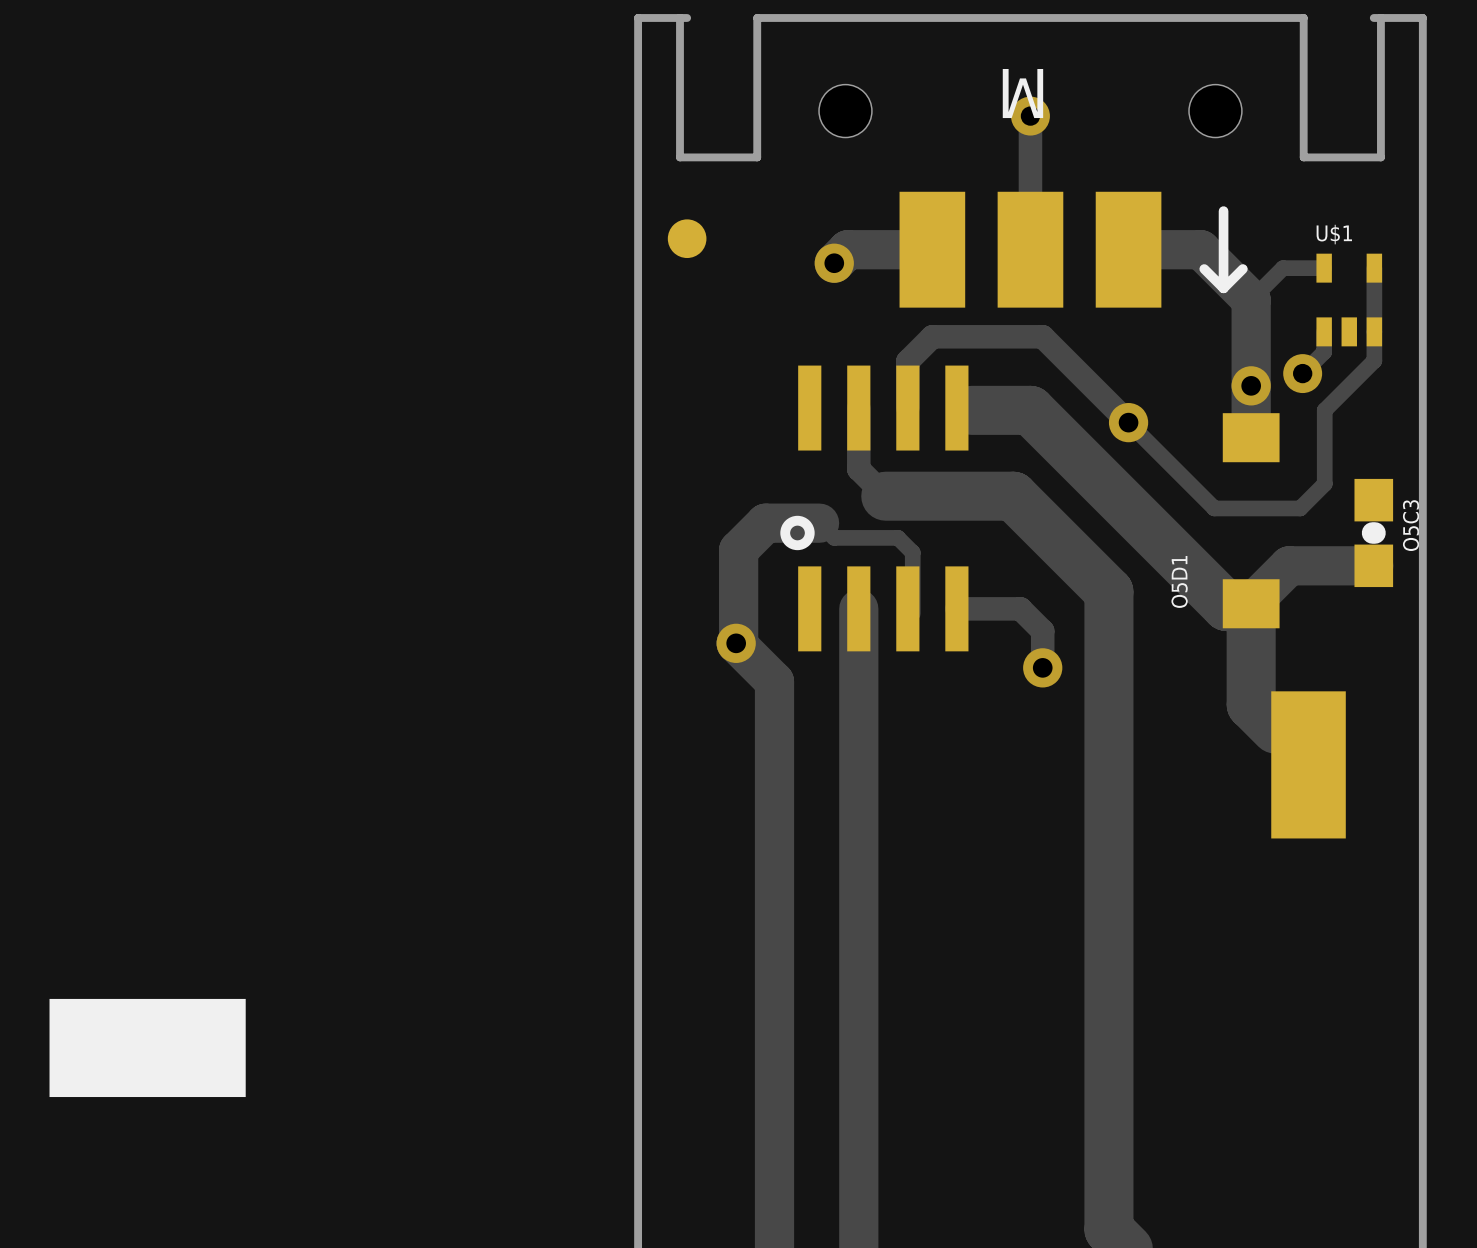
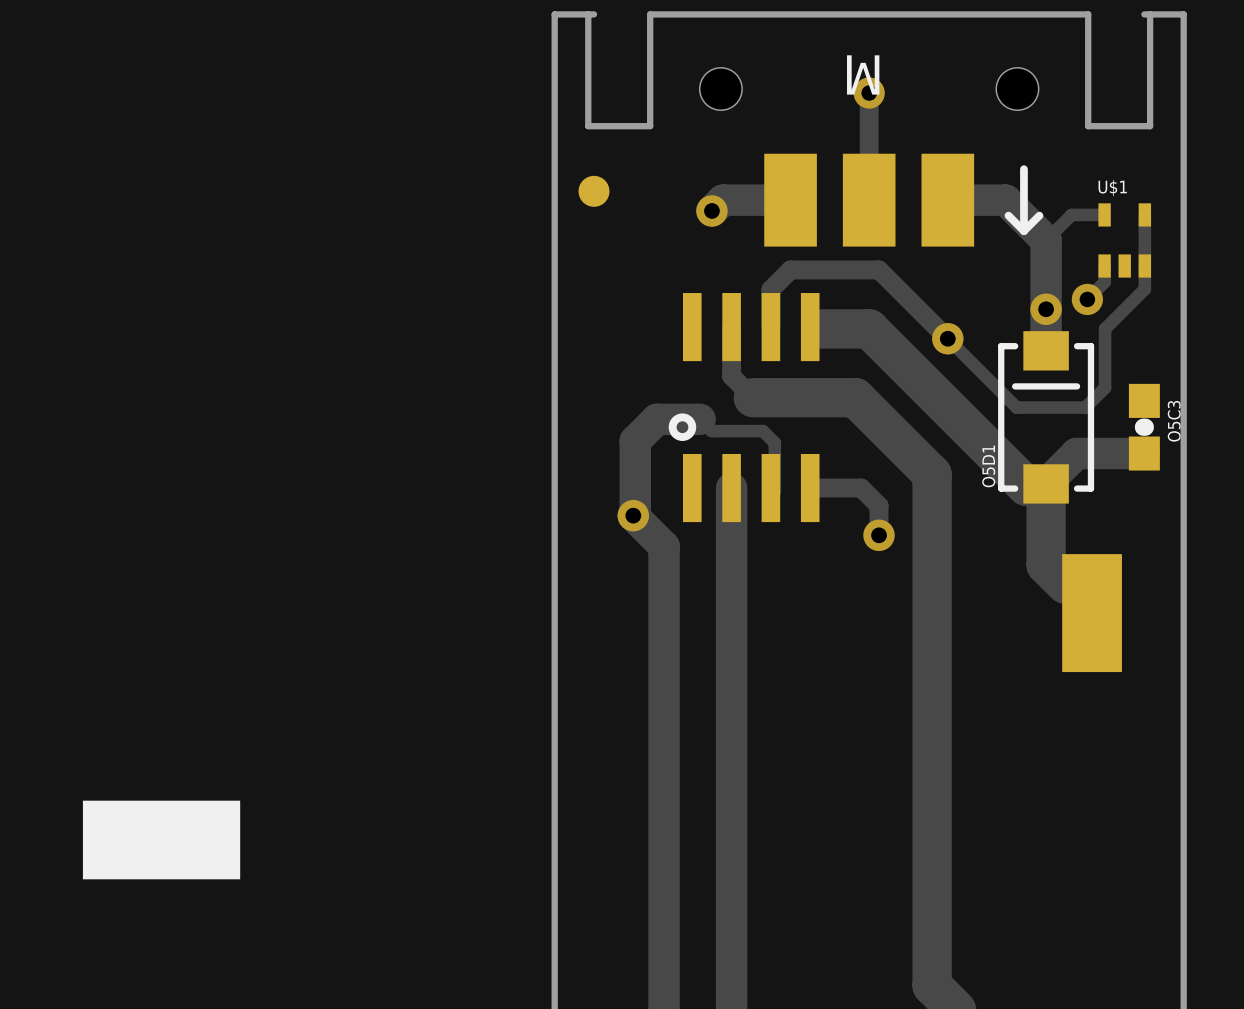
O5D1 footprint: [1222, 413, 1280, 629] -> [998, 331, 1095, 504]

